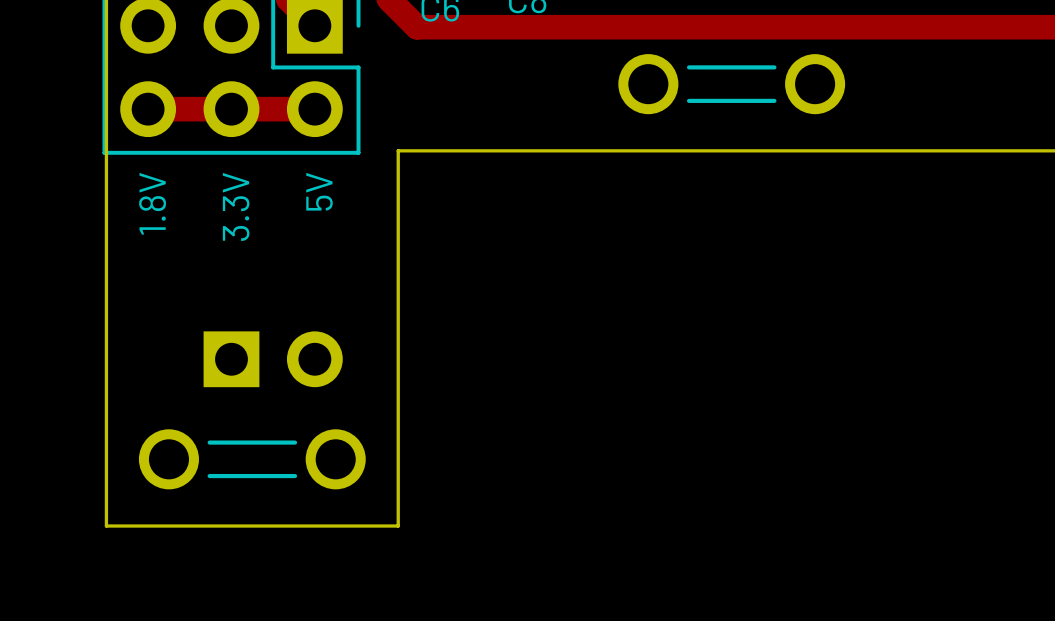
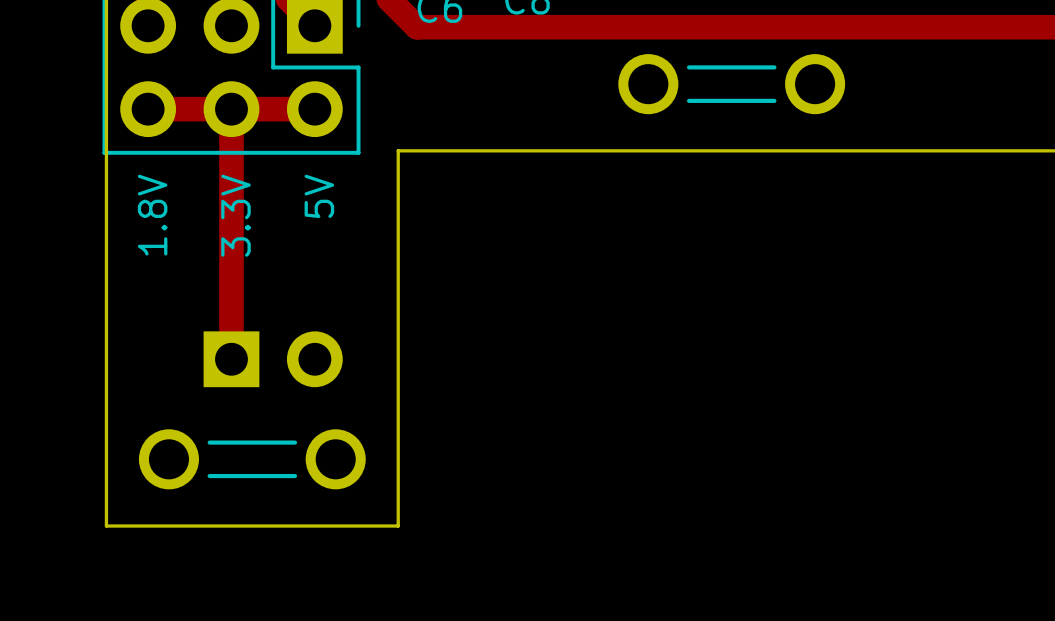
track: none -> (231, 109) (231, 359)

